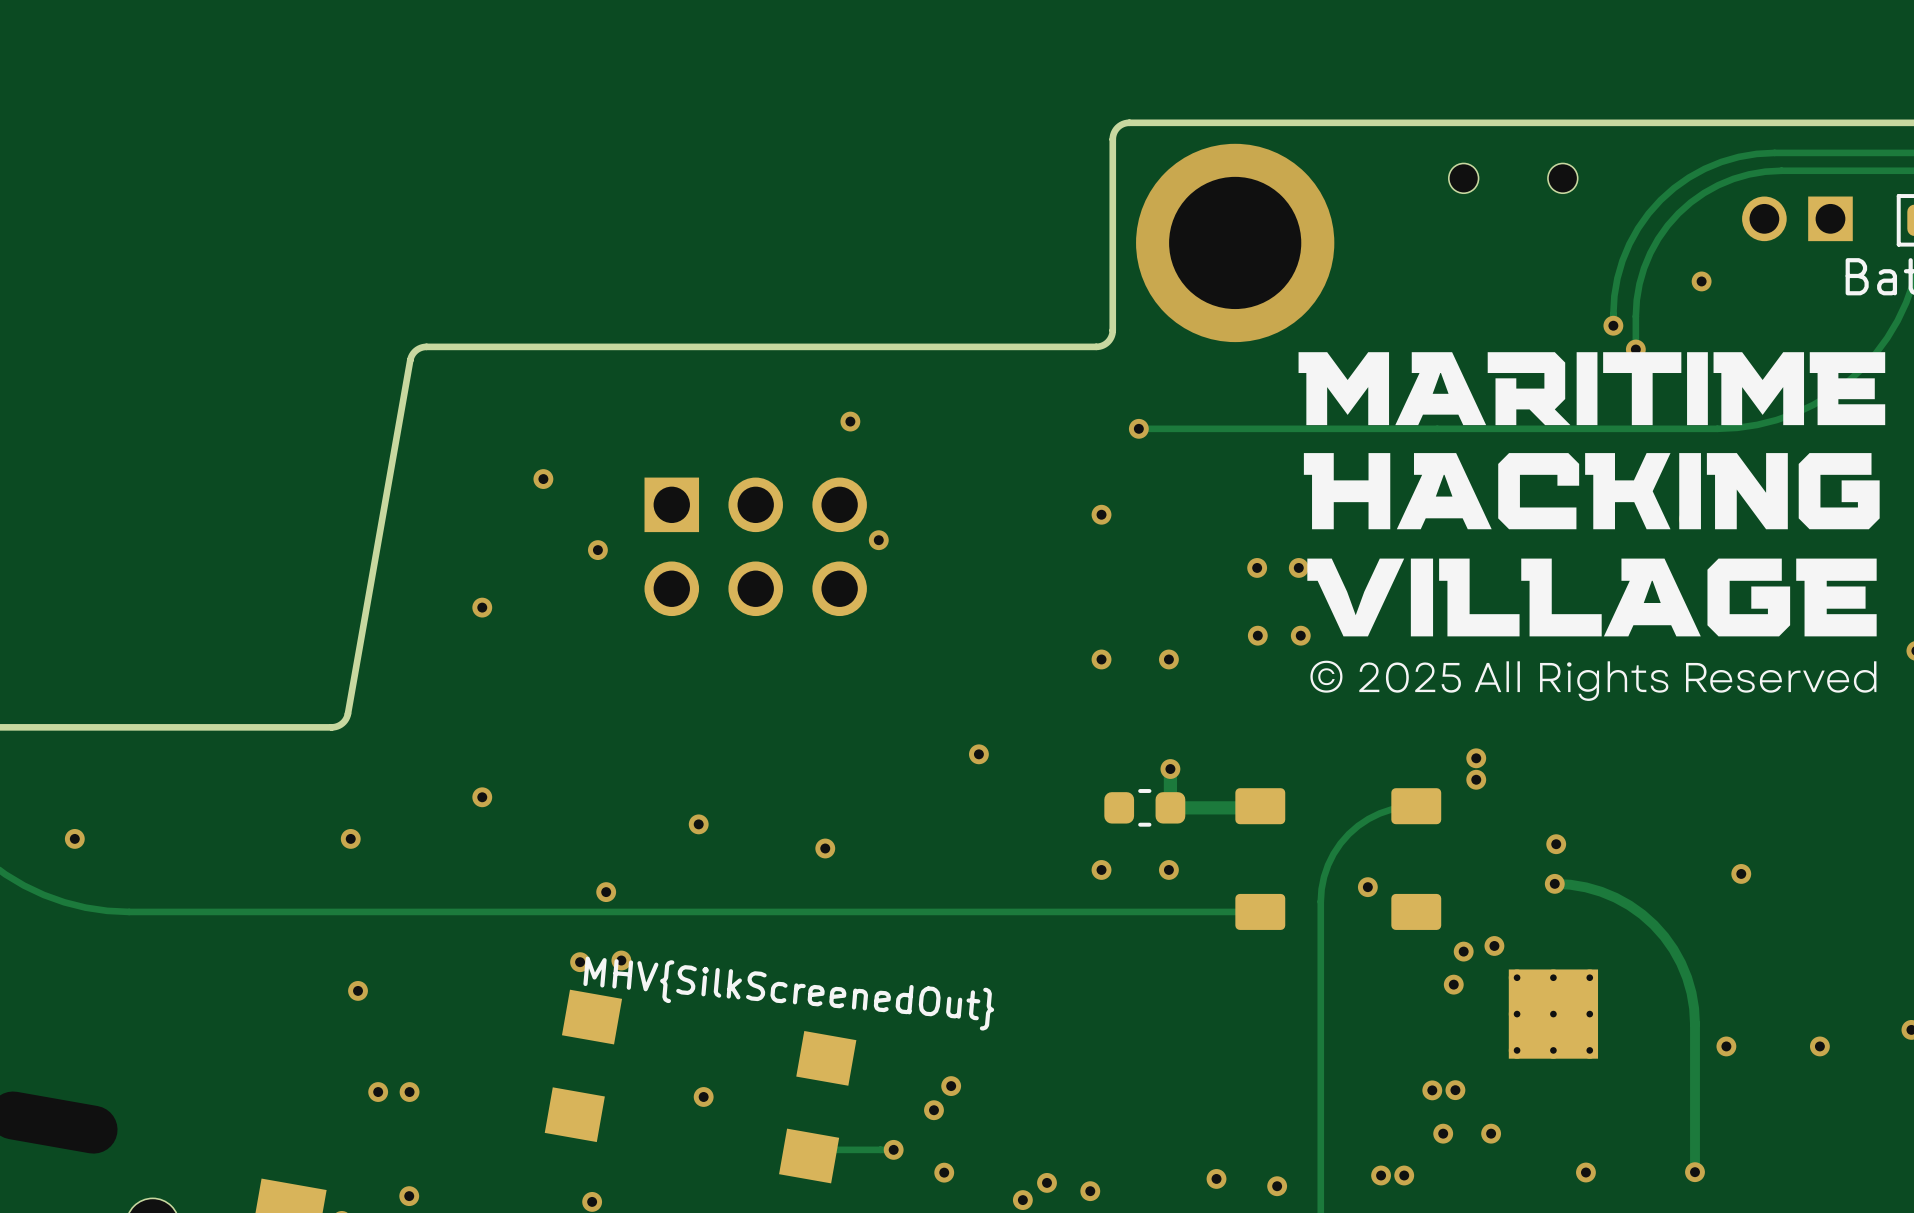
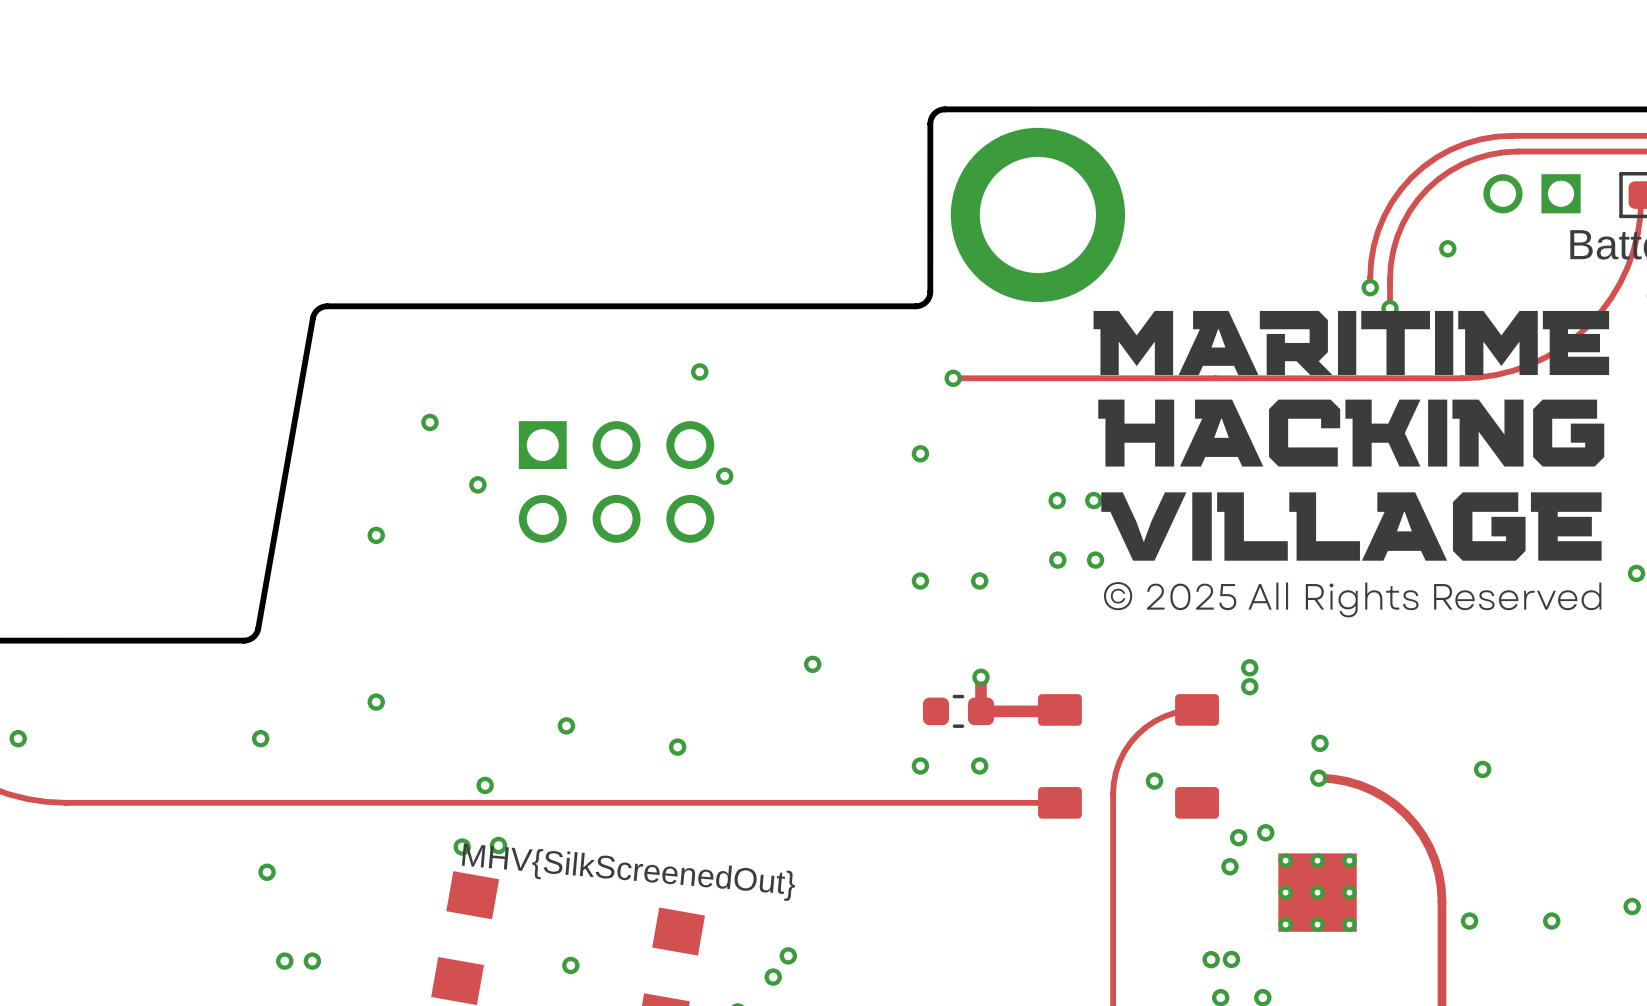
part: (1513, 178) -> none

